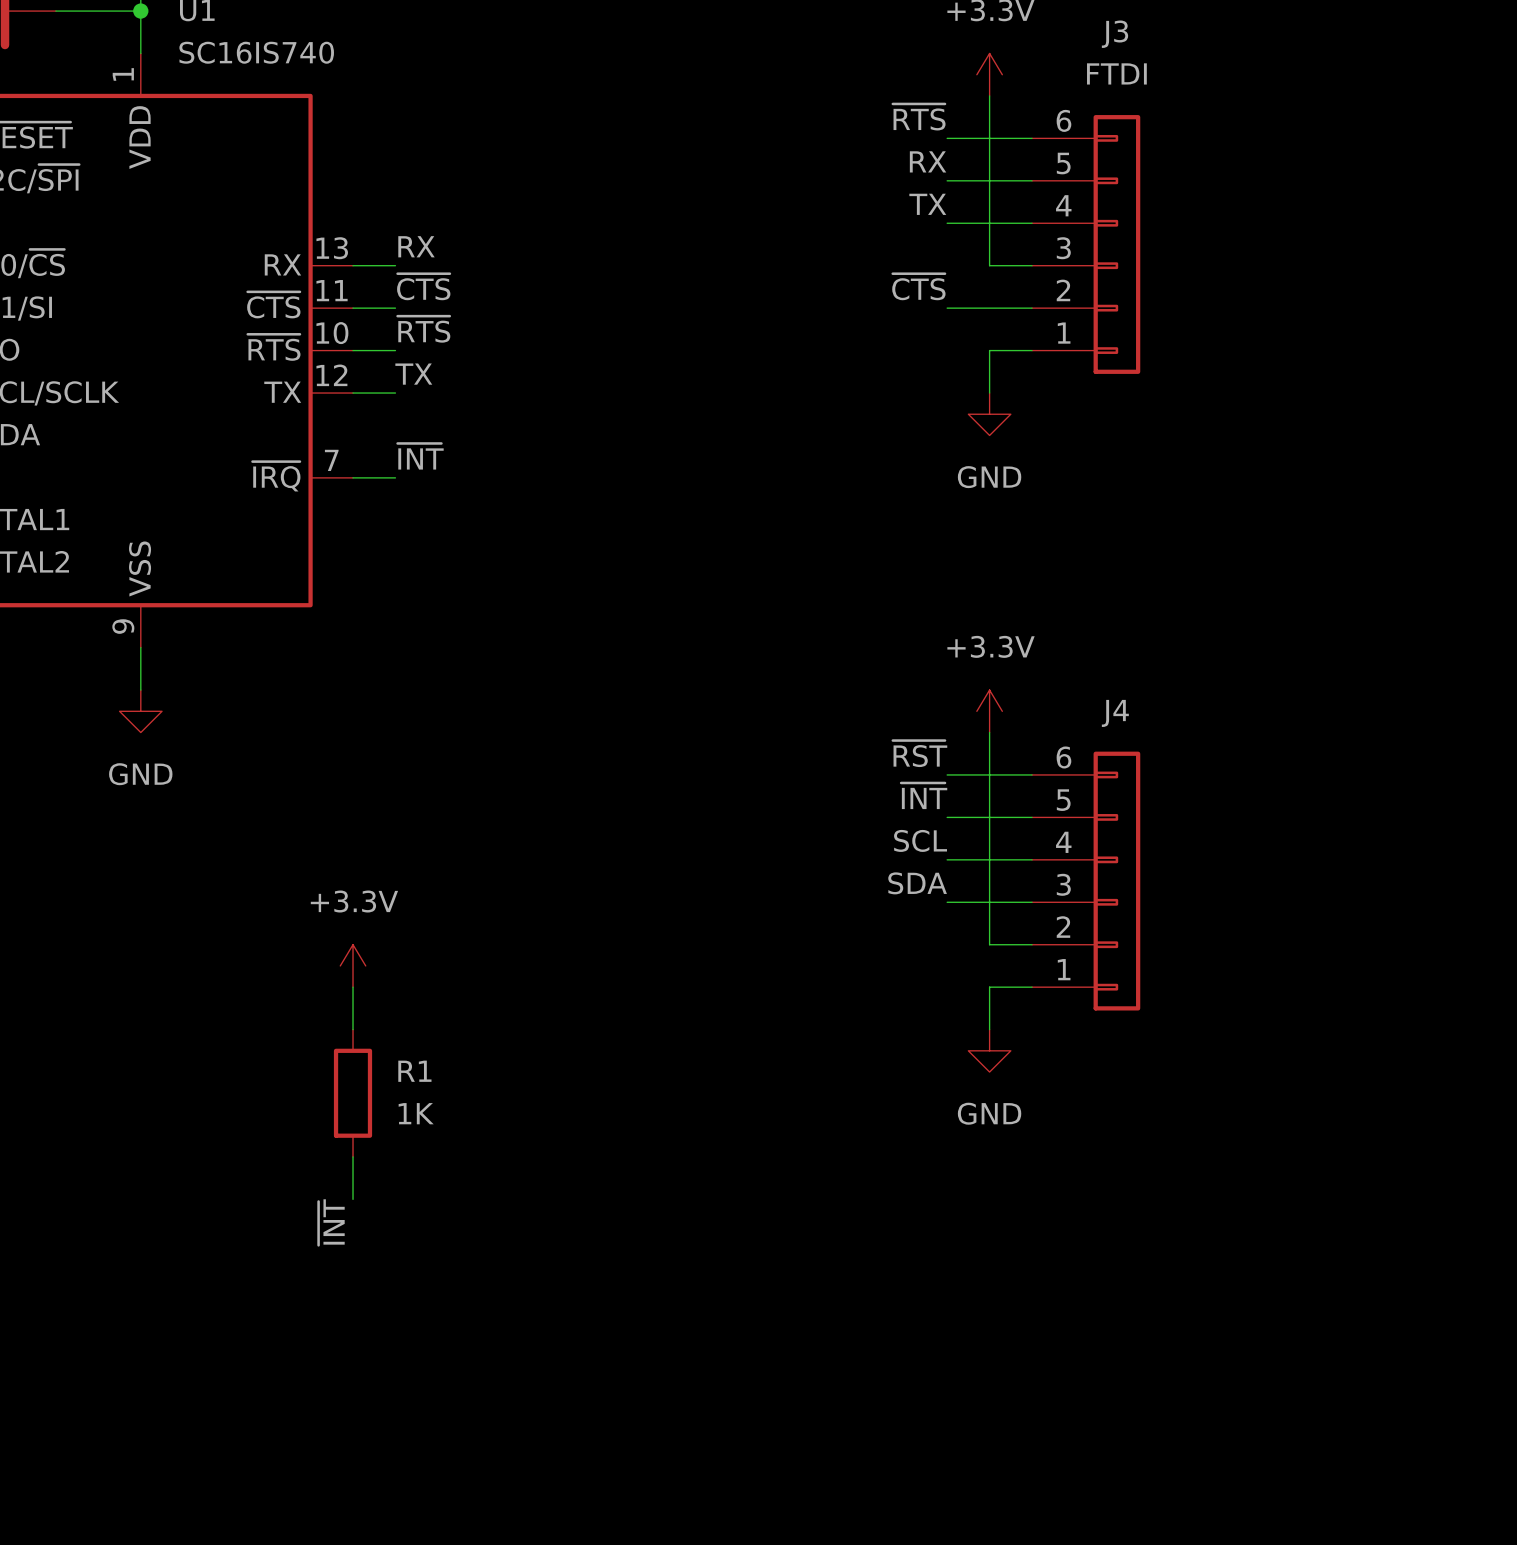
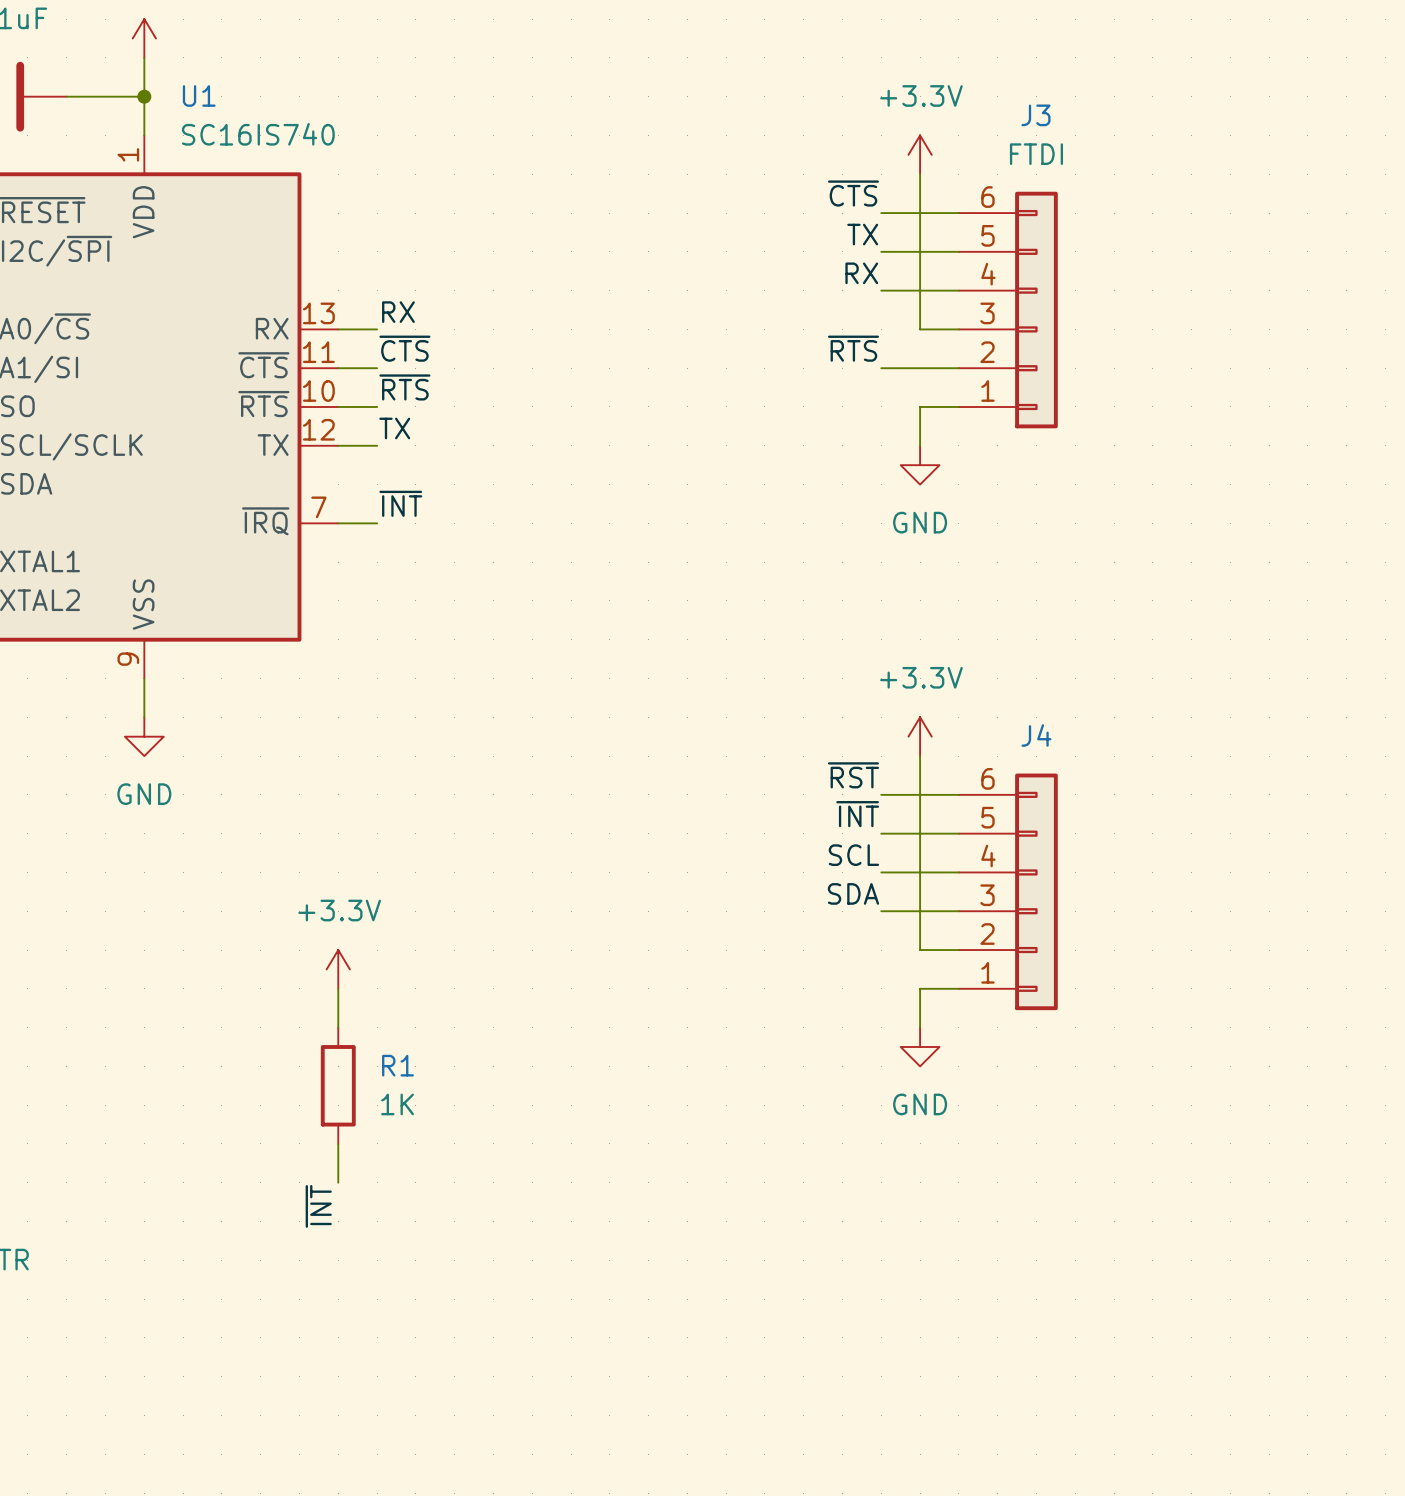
label: ~{RTS} (919, 117) -> ~{CTS} (853, 193)
label: RX (928, 161) -> TX (862, 234)
label: TX (927, 204) -> RX (861, 273)
label: ~{CTS} (918, 286) -> ~{RTS} (853, 348)

